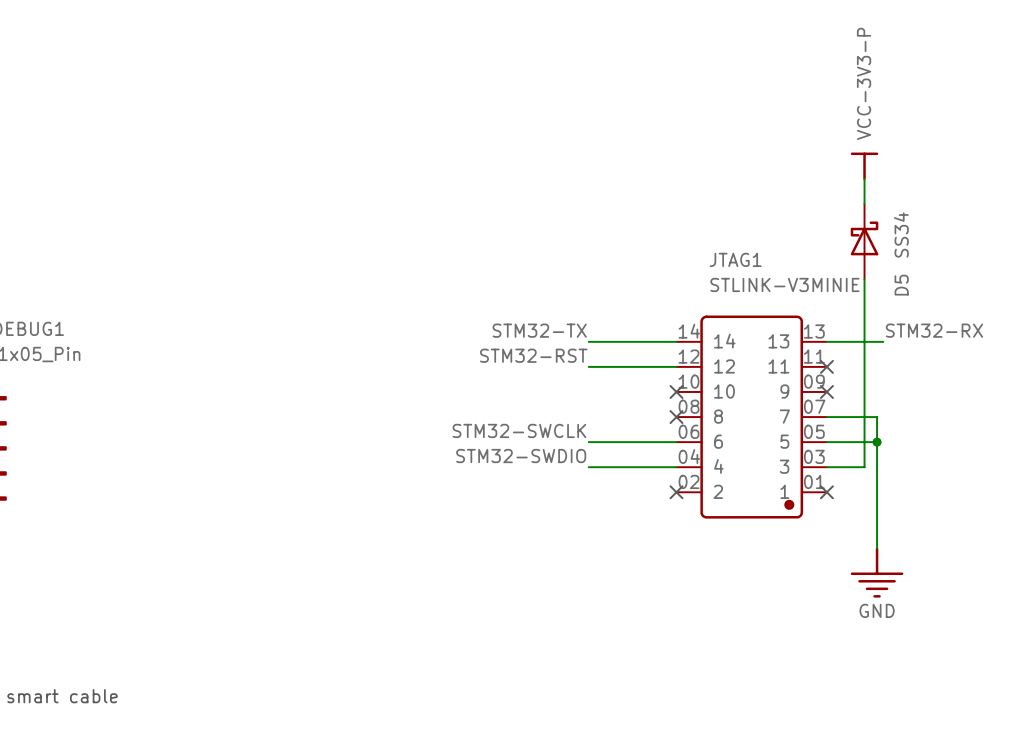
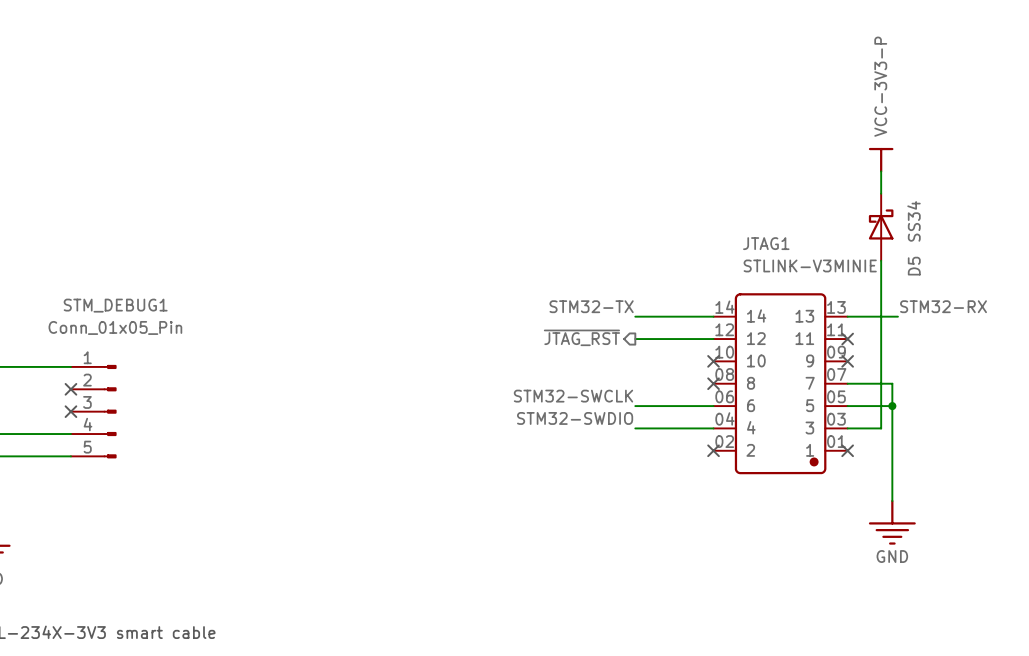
label: STM32-RST (533, 355) -> none
hierarchical label: none -> ~{JTAG_RST} (581, 337)

